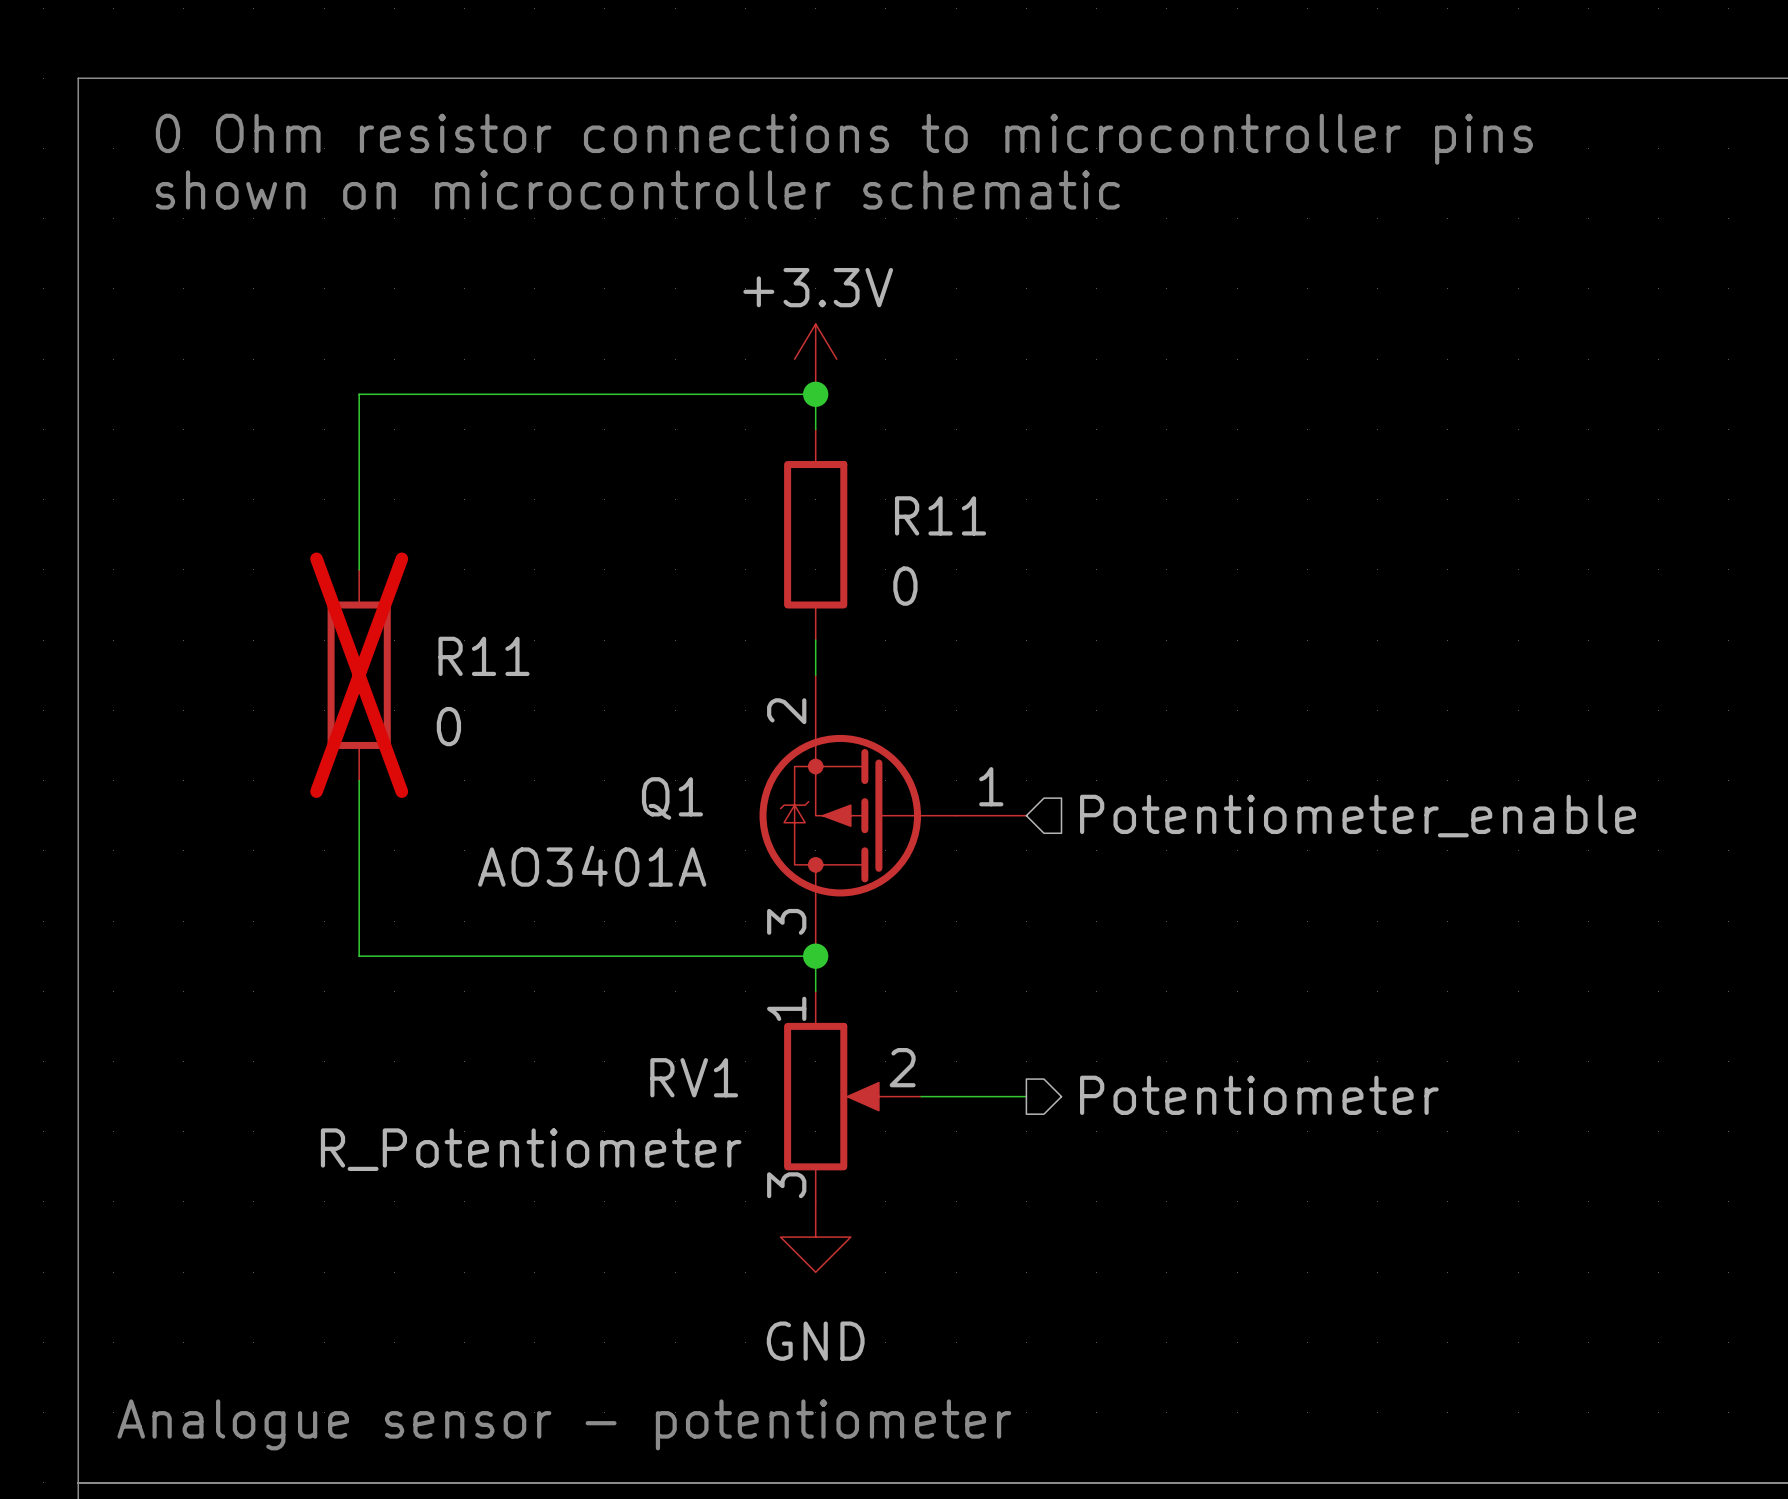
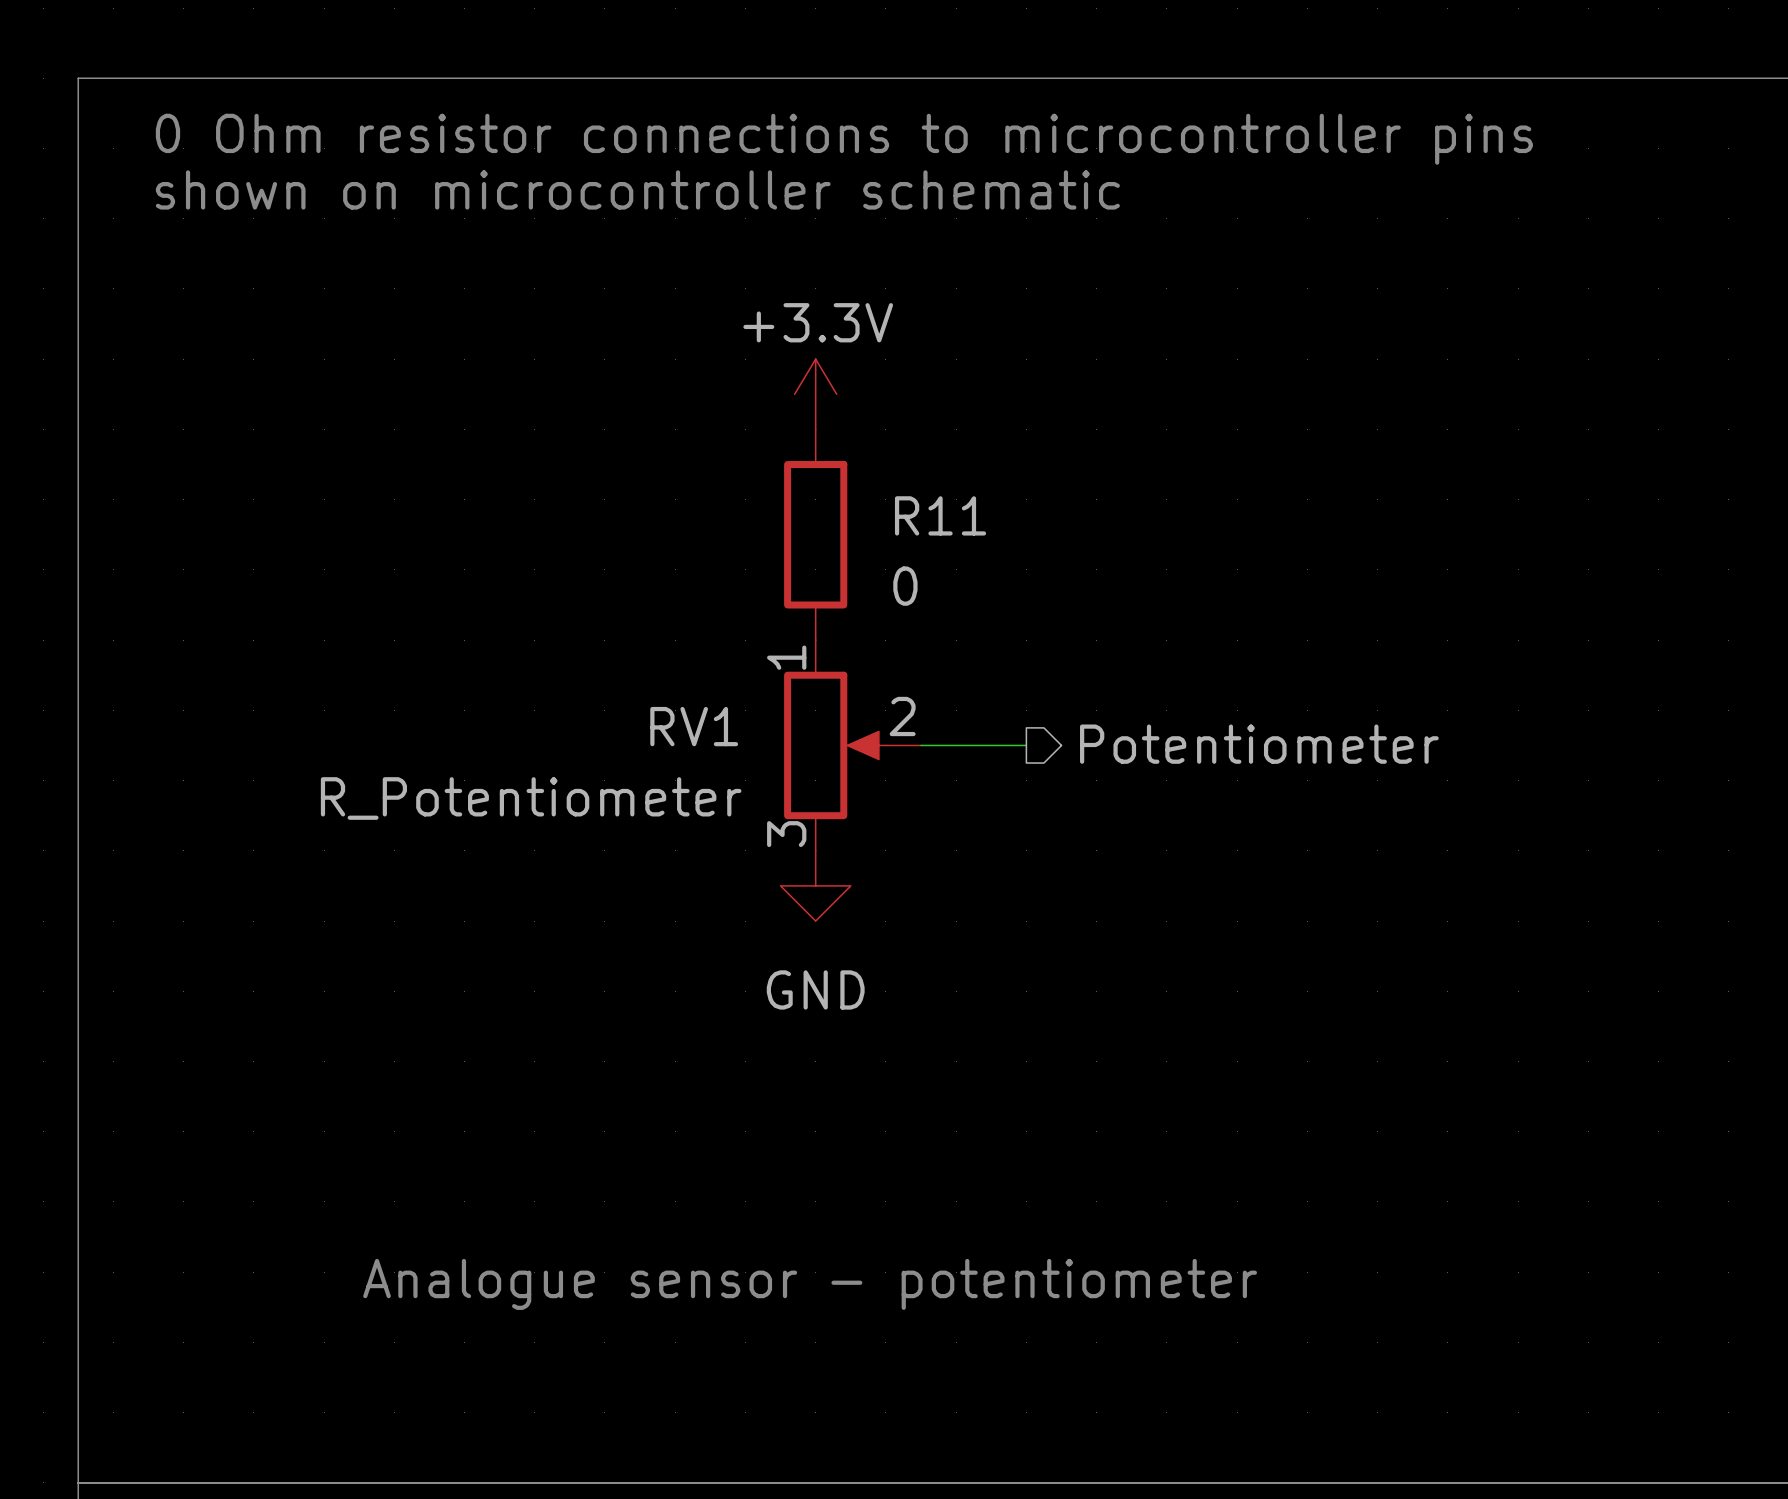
power symbol position: +3.3V (815, 359) -> +3.3V (815, 394)
junction: (815, 394) -> none
wire: (815, 429) (815, 394) (359, 394) (359, 569) -> none
R11: 0 (359, 675) -> none
wire: (359, 780) (359, 956) (815, 956) (815, 991) -> none
Q1: AO3401A (892, 815) -> none
hierarchical label: Potentiometer_enable (1358, 816) -> none
junction: (815, 956) -> none
hierarchical label position: Potentiometer (1259, 1095) -> Potentiometer (1259, 744)
RV1 position: (852, 1096) -> (852, 745)
wire: (921, 1096) (1026, 1096) -> (921, 745) (1026, 745)
power symbol position: GND (815, 1237) -> GND (815, 885)
text position: Analogue sensor - potentiometer (564, 1424) -> Analogue sensor - potentiometer (810, 1284)

